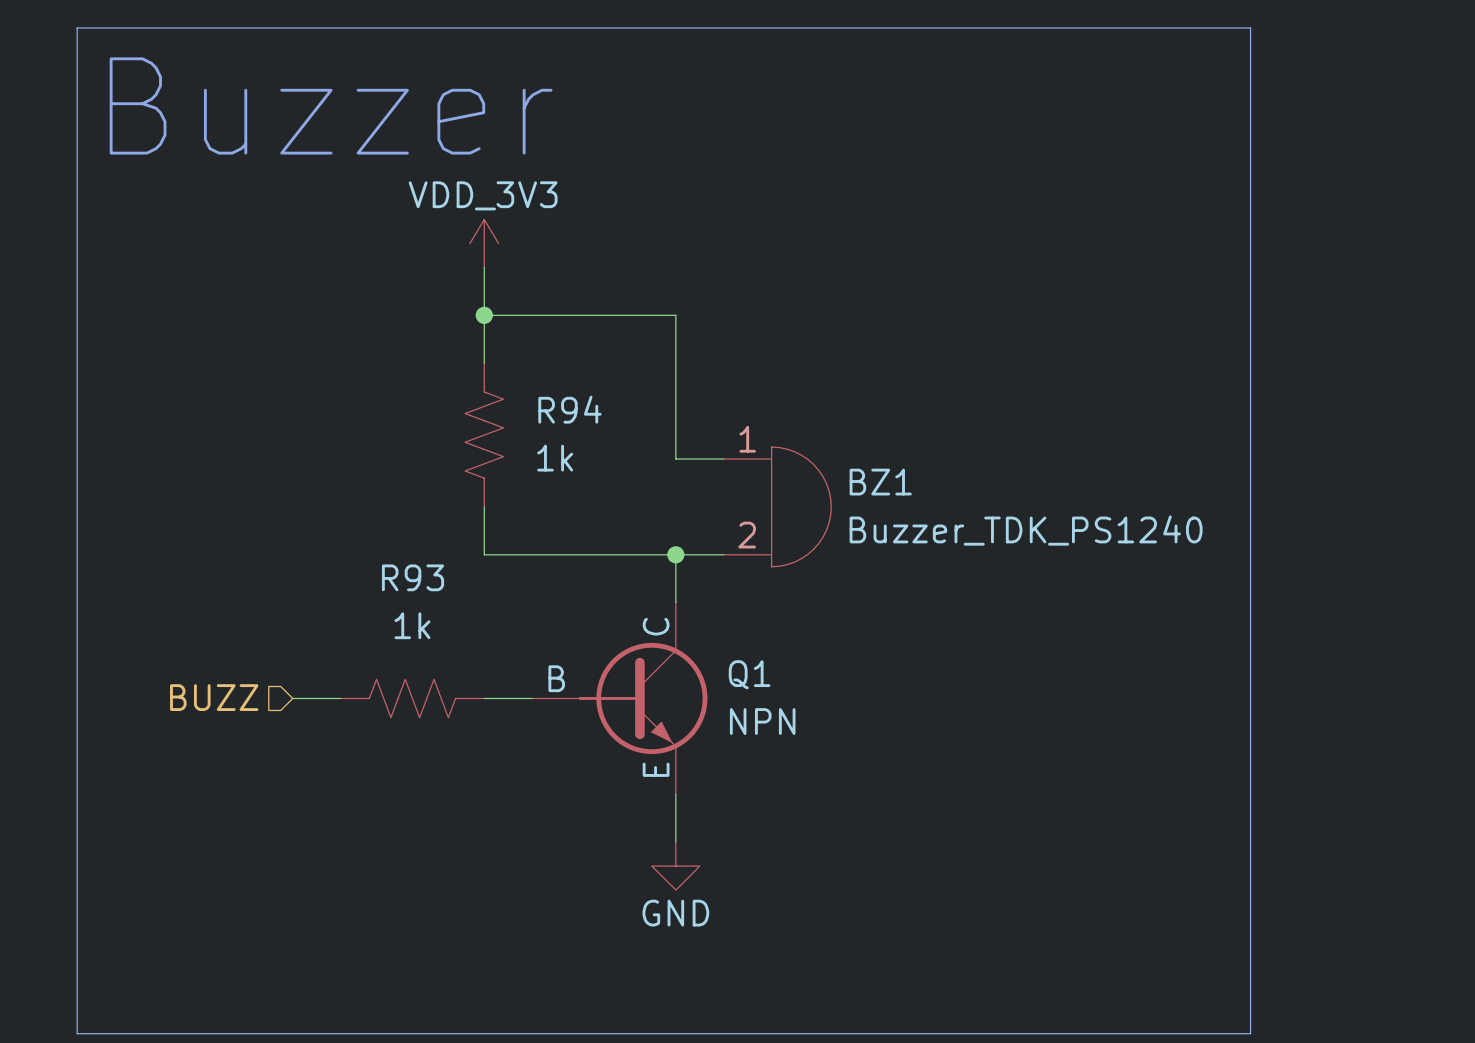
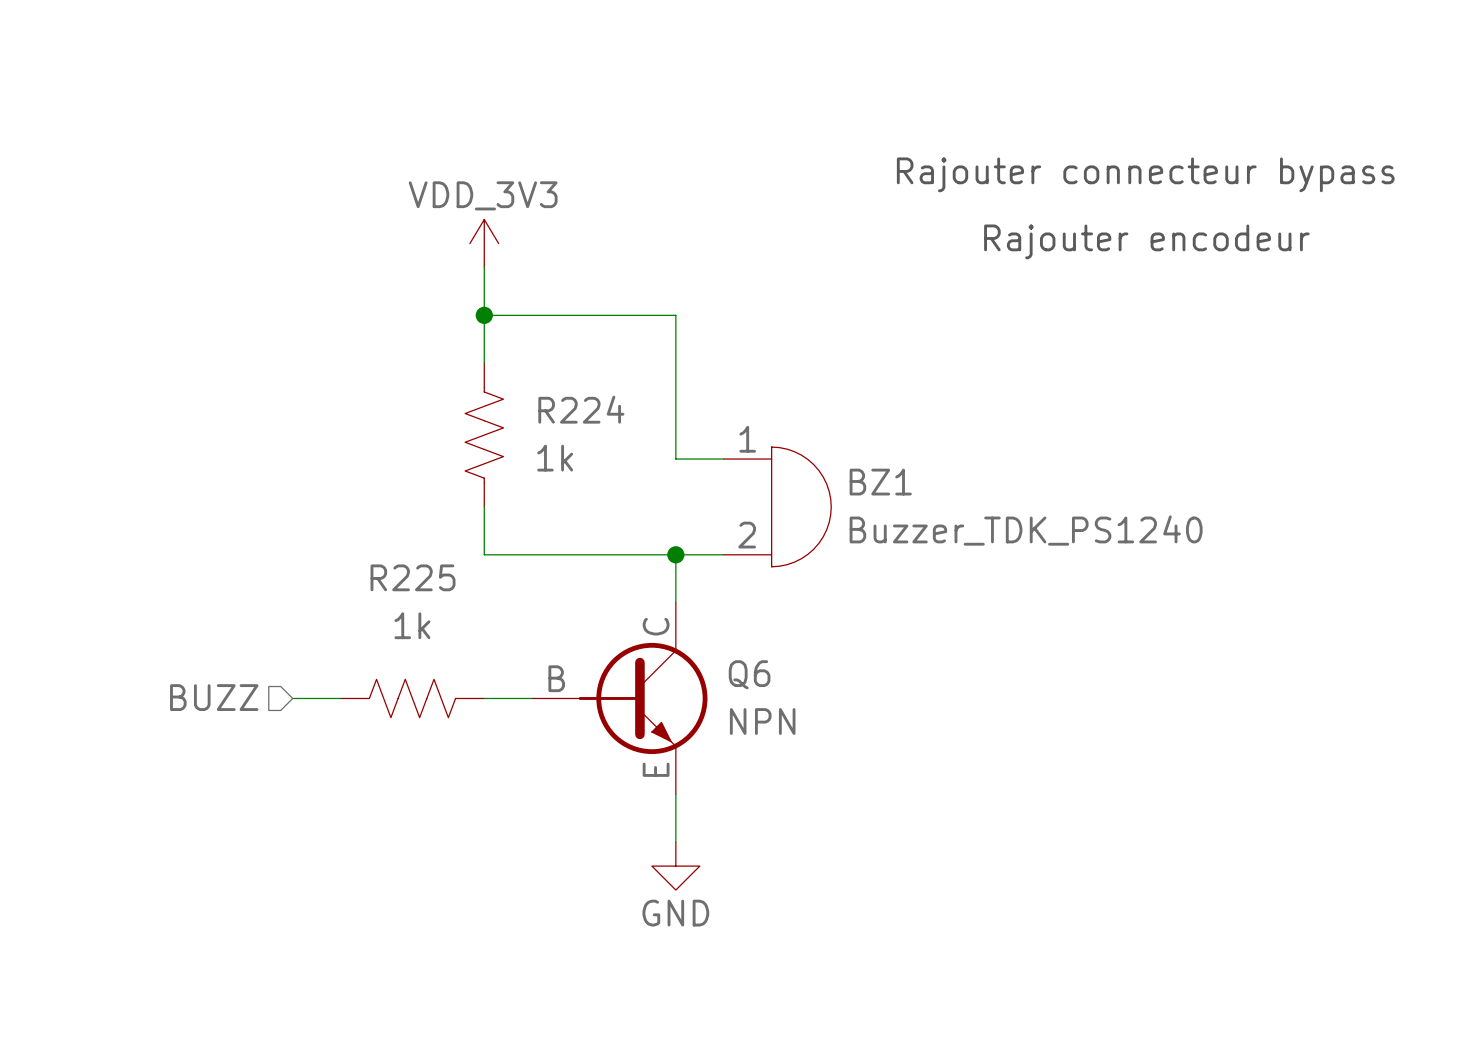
line: (77, 28) (1250, 28) (1250, 1033) (77, 1033) (77, 28) -> none
text: Buzzer (331, 105) -> none
text: none -> Rajouter connecteur bypass (1145, 174)
text: none -> Rajouter encodeur (1146, 241)
R94 name: R94 (569, 409) -> R224 (581, 409)
R93 name: R93 (413, 577) -> R225 (413, 577)
Q1 name: Q1 (749, 674) -> Q6 (749, 674)

